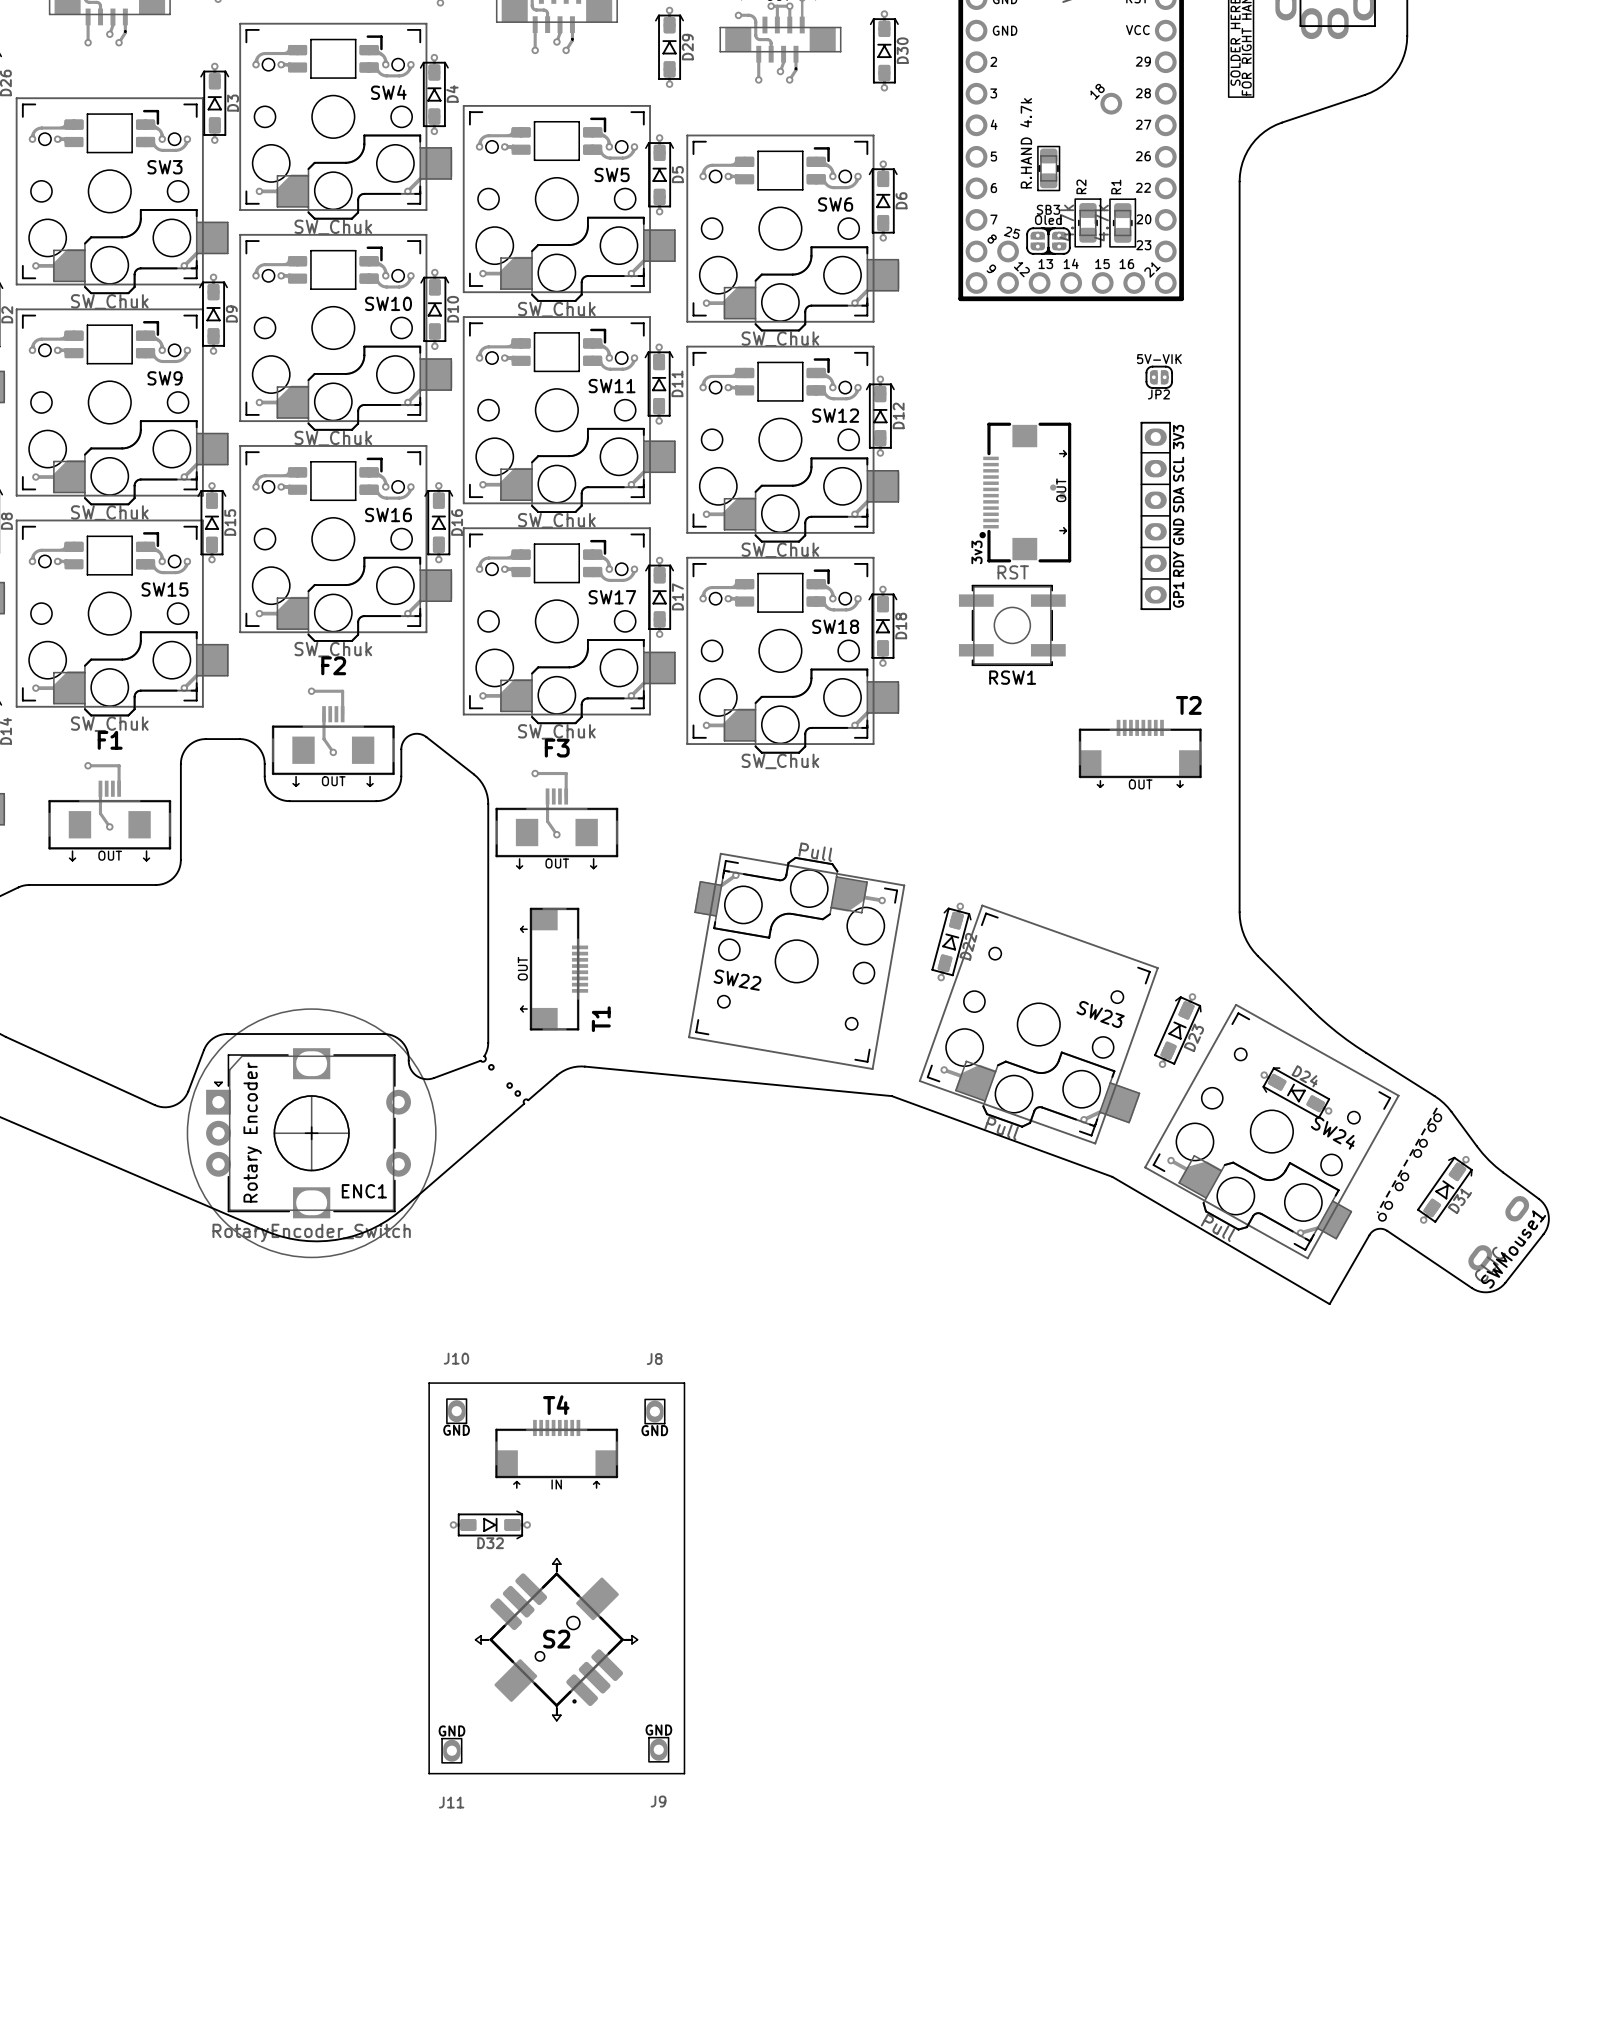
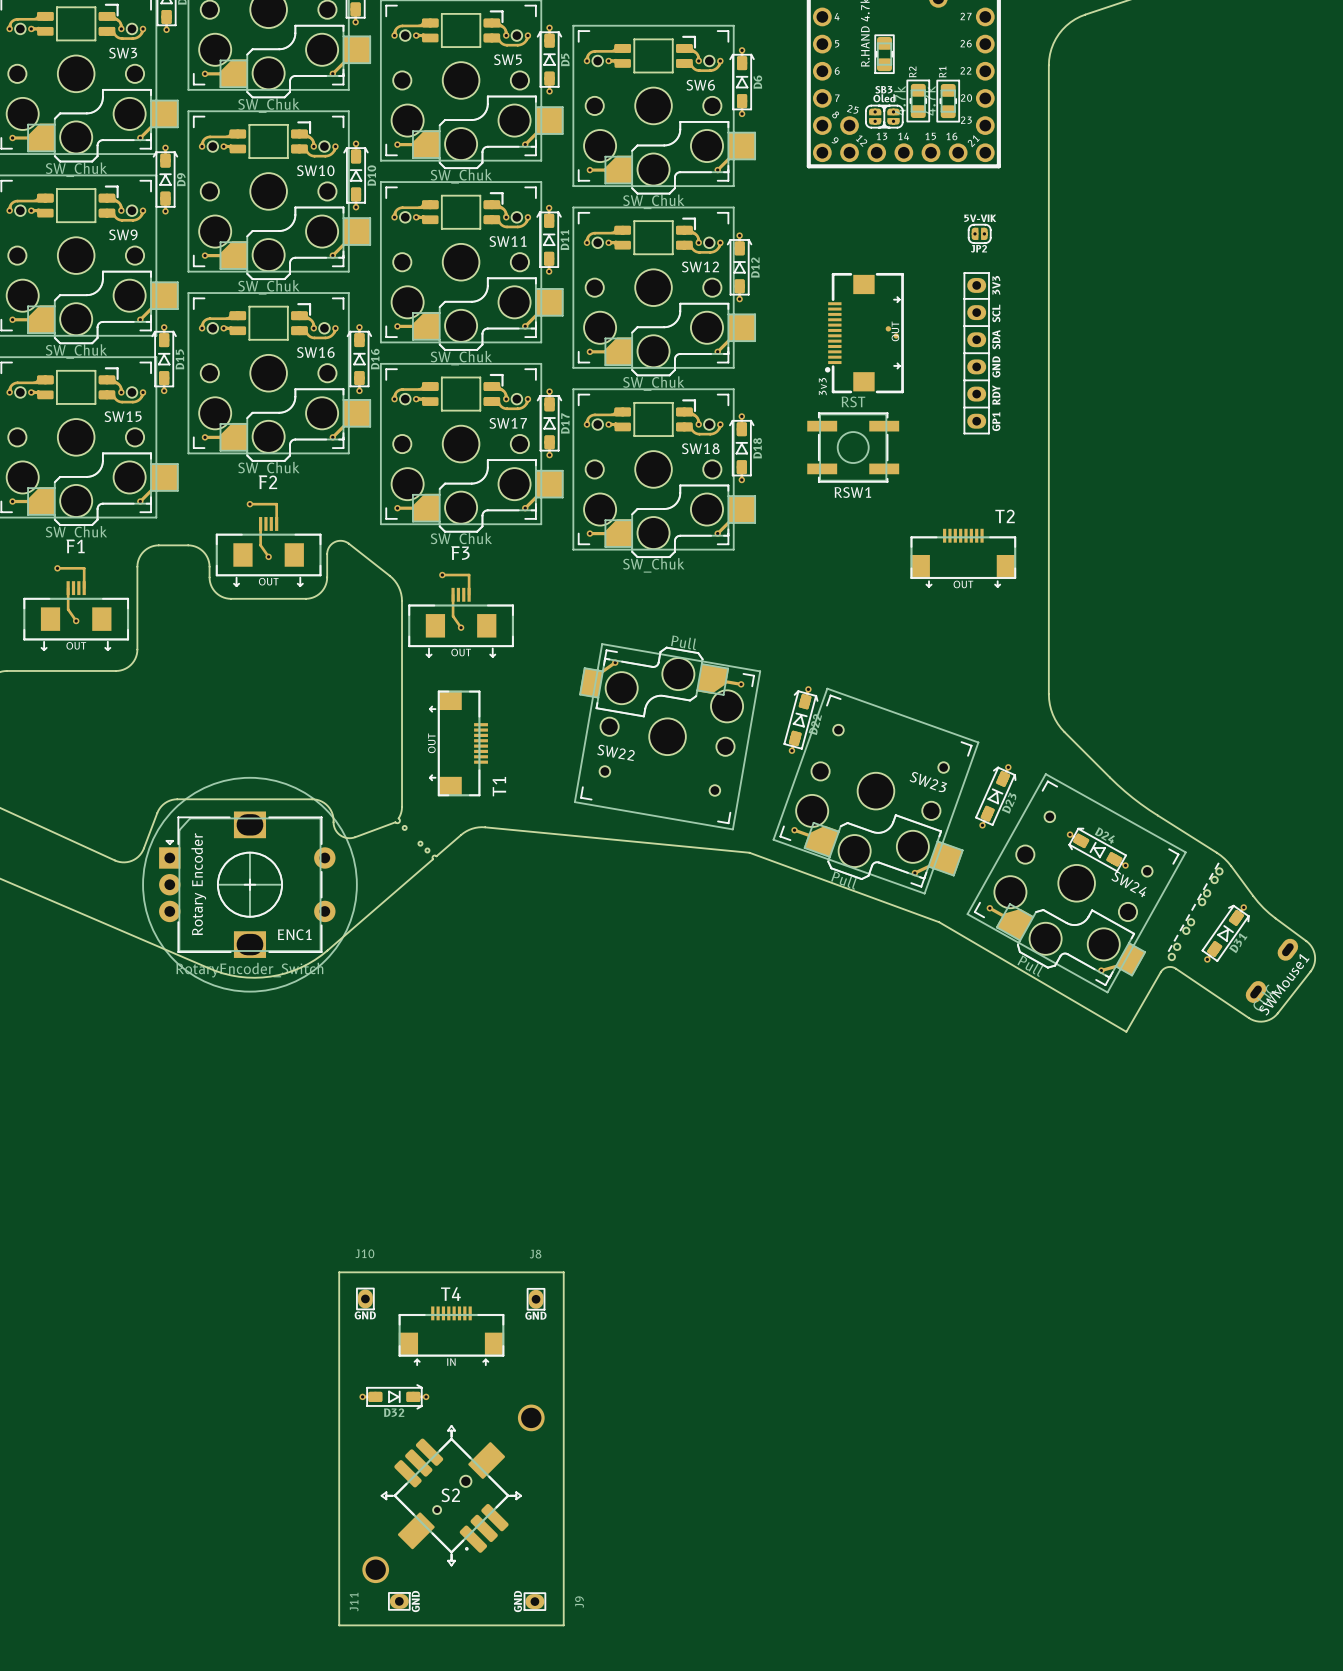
board edge: (429, 1383) (684, 1383) (684, 1773) (429, 1773) (429, 1383) -> none
J10 position: (456, 1411) -> (365, 1298)
J8 position: (654, 1411) -> (536, 1299)
T4 position: (556, 1454) -> (451, 1336)
D32 position: (490, 1524) -> (394, 1396)
board edge: none -> (339, 1272) (563, 1272) (563, 1625) (339, 1625) (339, 1272)
S2 position: (556, 1639) -> (451, 1495)
J9 rotation: 0° (658, 1749) -> 90° counterclockwise (534, 1601)
J9 position: (658, 1749) -> (534, 1601)
J11 rotation: 0° (451, 1750) -> 90° clockwise (399, 1601)
J11 position: (451, 1750) -> (399, 1601)
part: none -> (531, 1417)
part: none -> (375, 1569)

